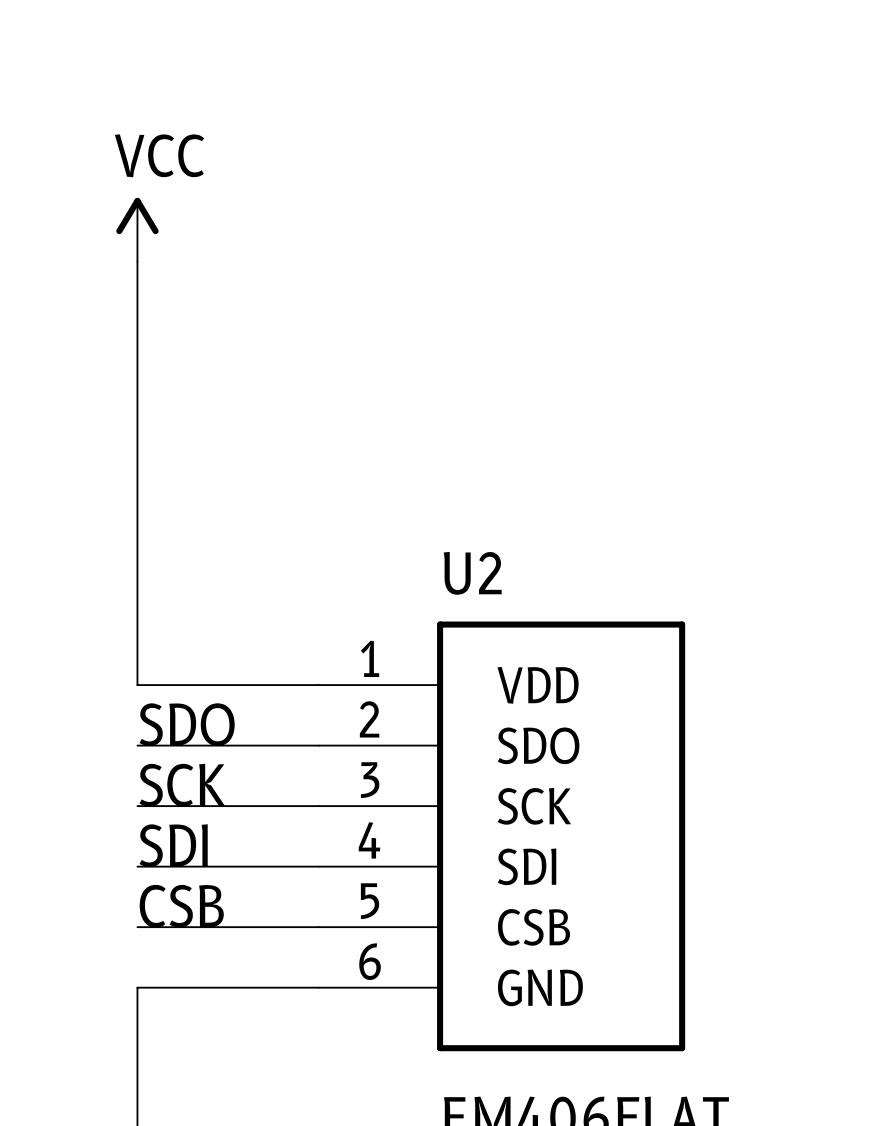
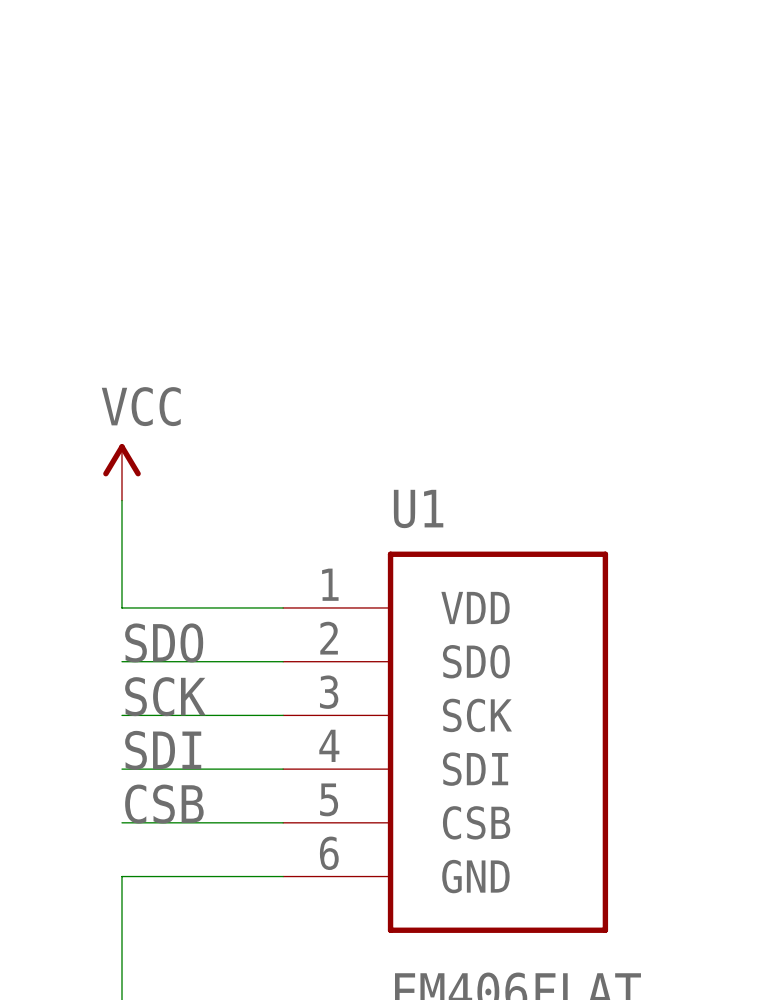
power symbol position: VCC (137, 229) -> VCC (121, 472)
wire: (137, 261) (137, 564) -> none
U2 name: U2 (472, 573) -> U1 (418, 508)

